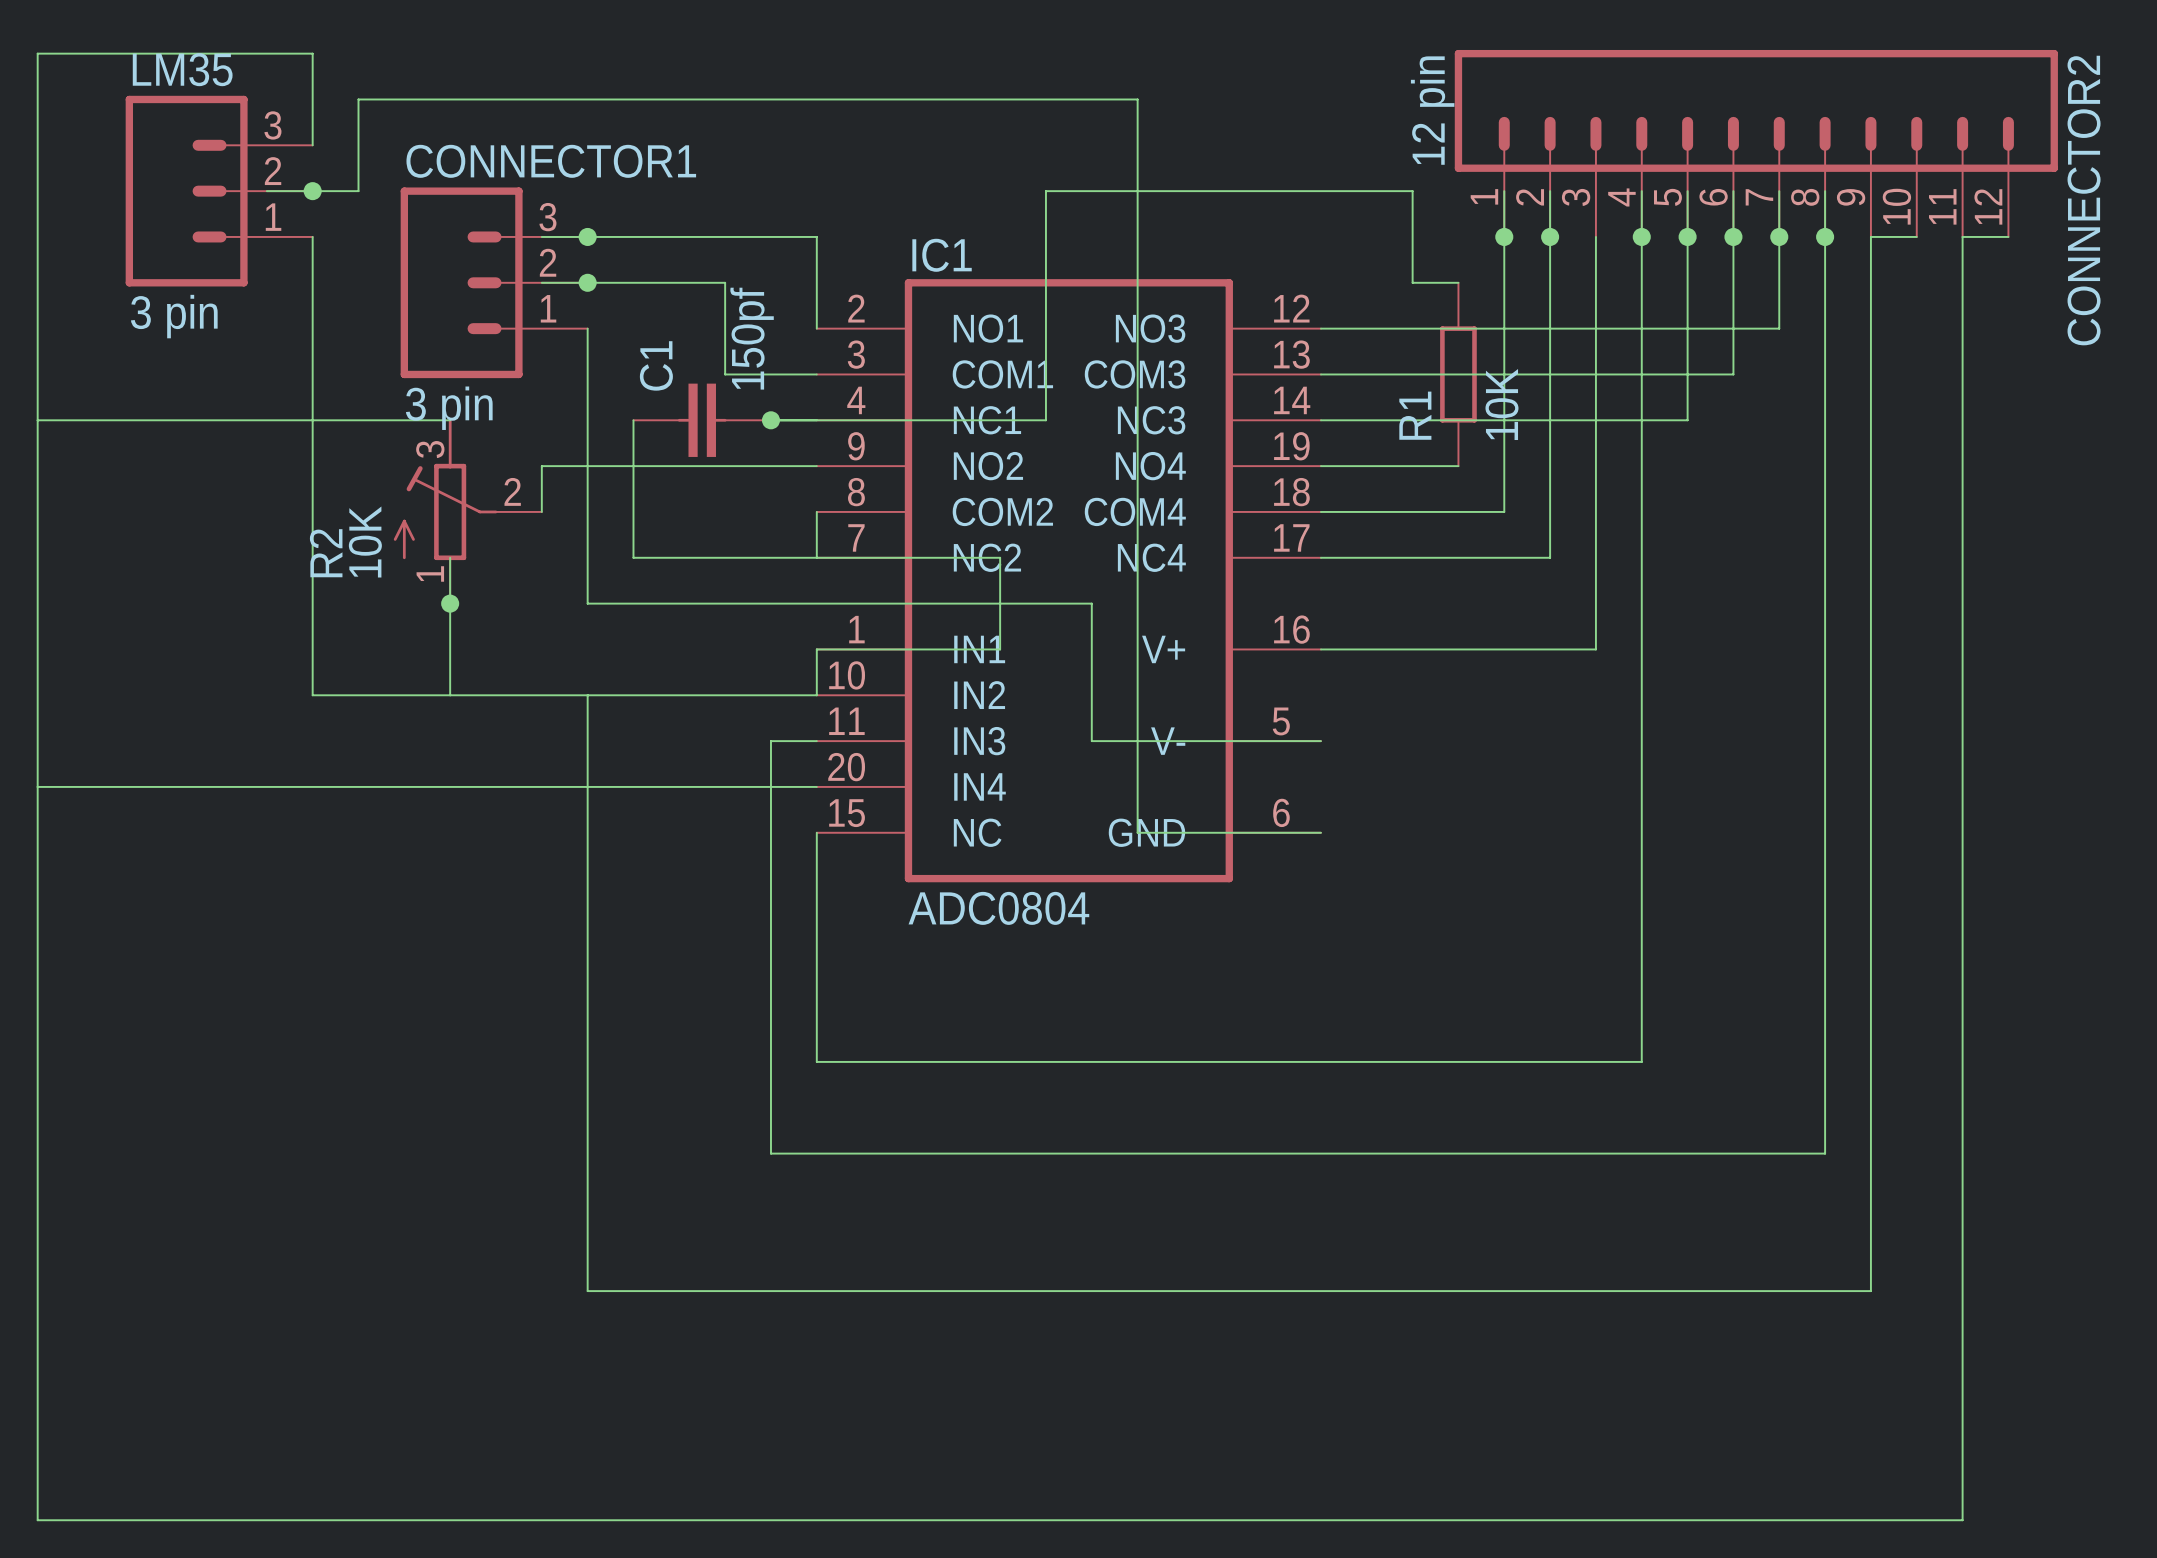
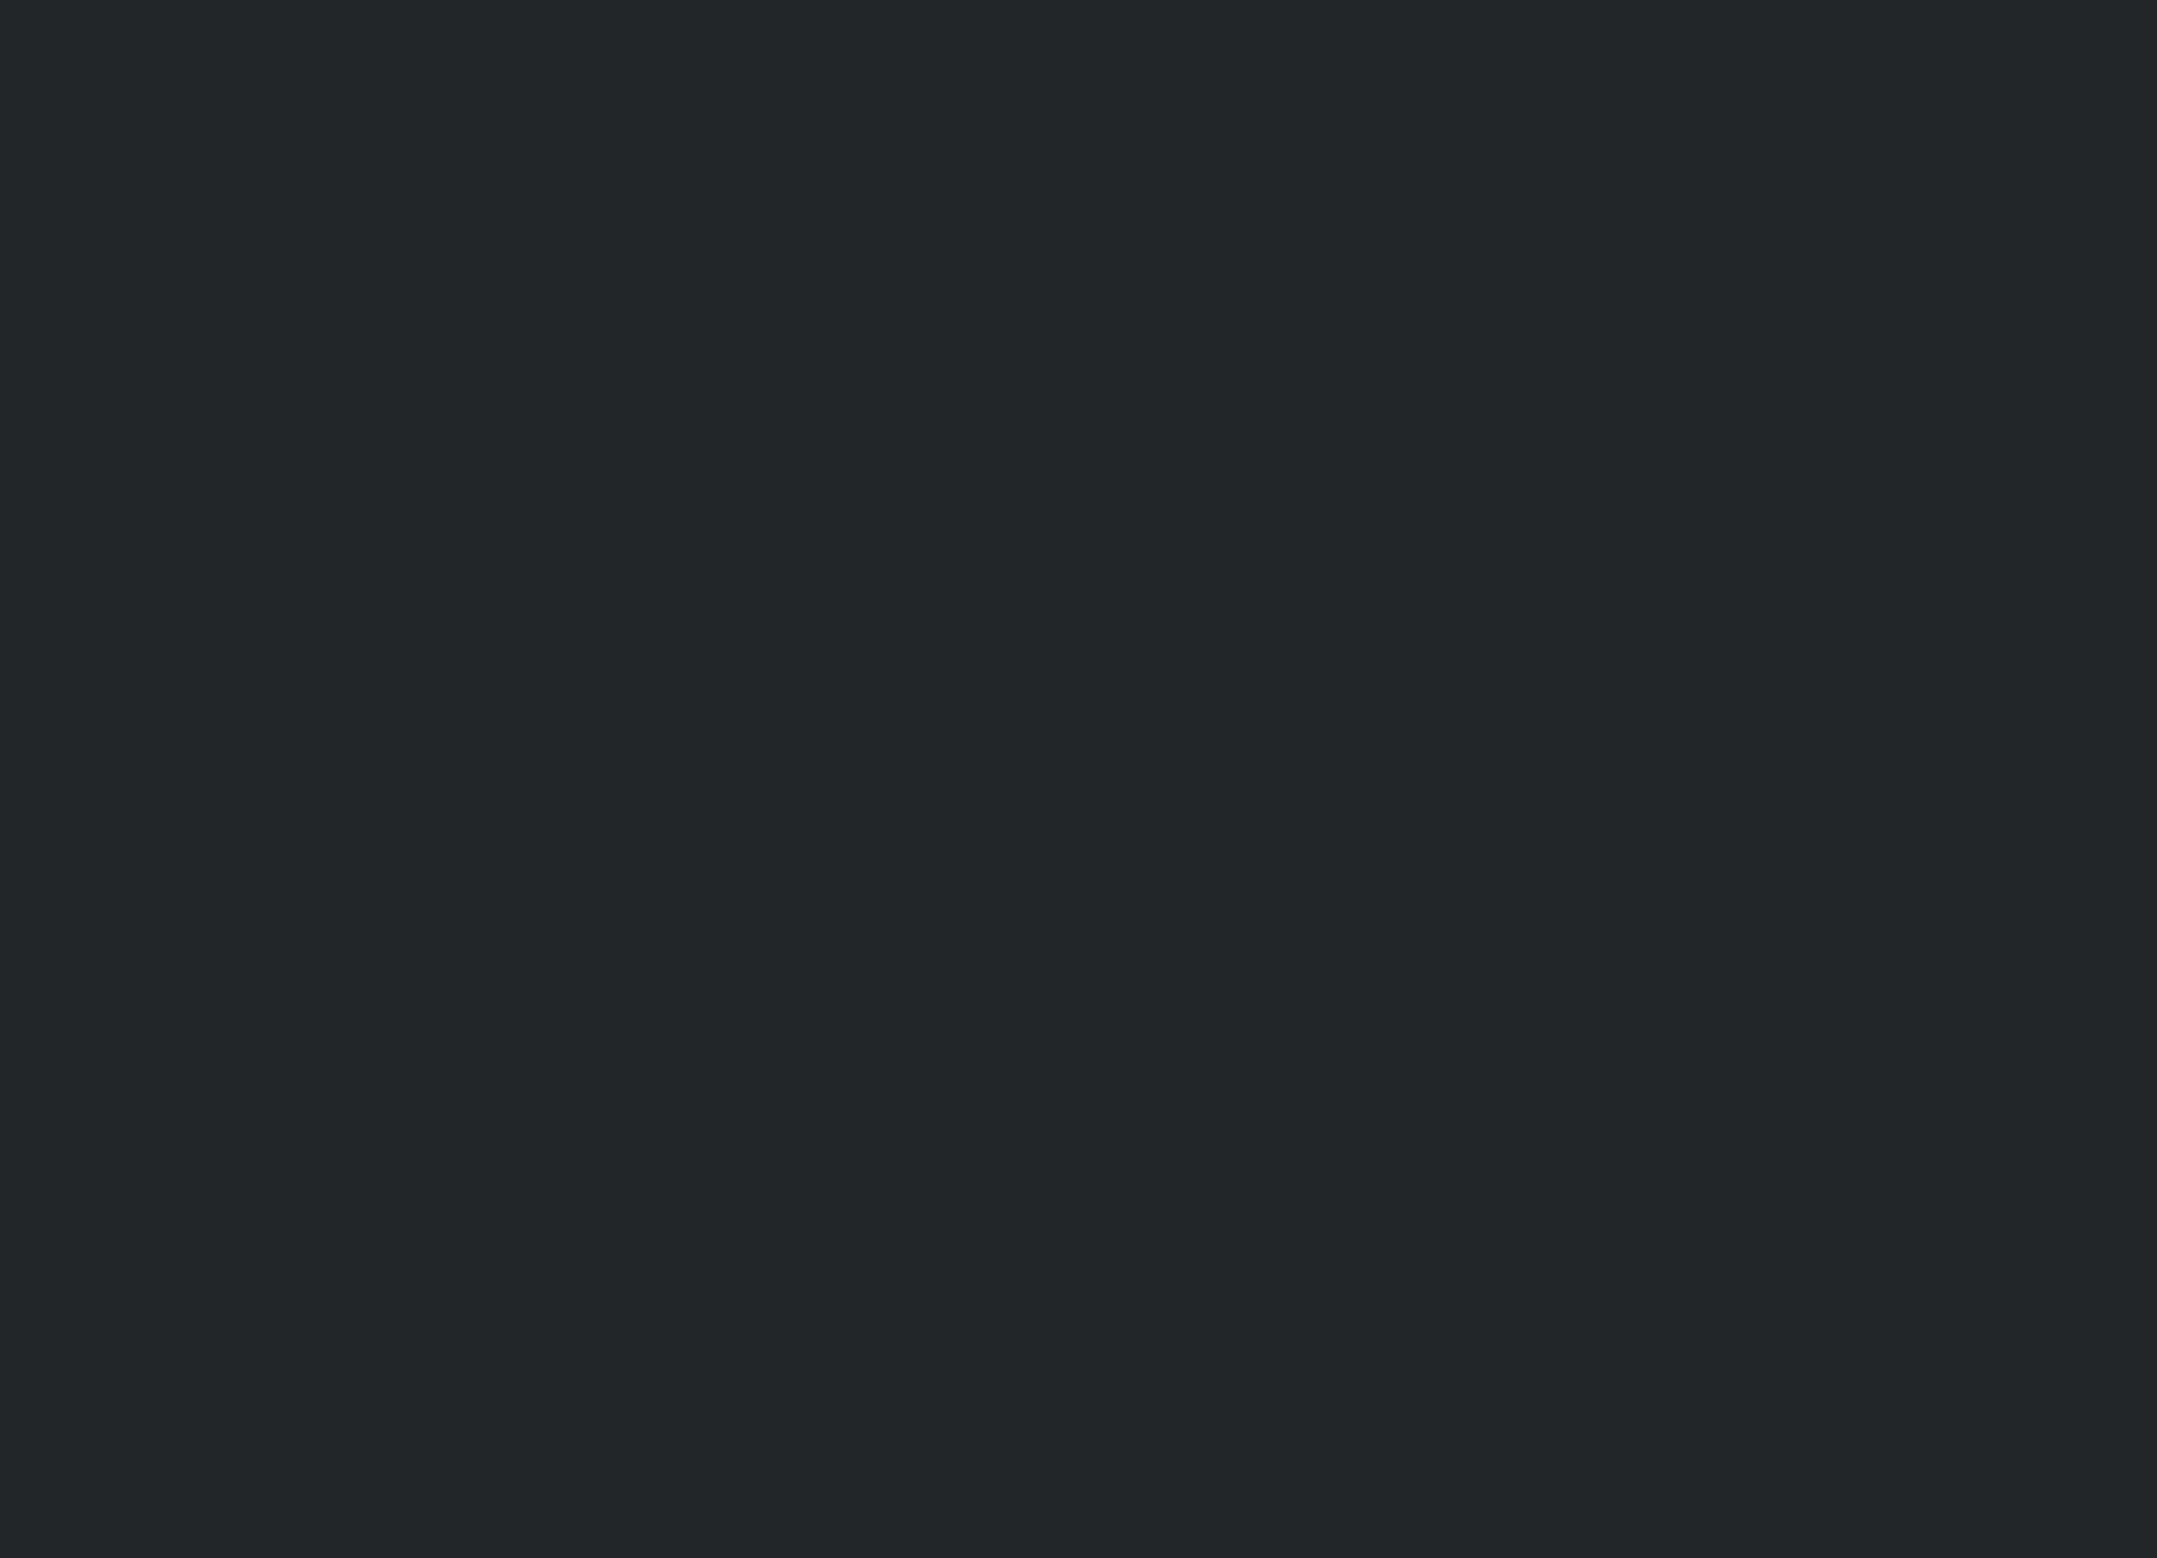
CONNECTOR2: 12 pin (1756, 143) -> none
wire: (312, 145) (312, 53) (37, 53) (37, 1520) (1962, 1520) (1962, 236) (2008, 236) -> none
LM35: 3 pin (219, 191) -> none
wire: (266, 191) (358, 191) (358, 99) (1137, 99) (1137, 832) (1320, 832) -> none
junction: (312, 191) -> none
wire: (1504, 191) (1504, 511) (1320, 511) -> none
wire: (1550, 191) (1550, 557) (1320, 557) -> none
wire: (1641, 191) (1641, 1061) (816, 1061) (816, 832) -> none
wire: (1687, 191) (1687, 420) (1320, 420) -> none
wire: (1733, 191) (1733, 374) (1320, 374) -> none
wire: (1779, 191) (1779, 328) (1320, 328) -> none
wire: (1825, 191) (1825, 1153) (770, 1153) (770, 741) (816, 741) -> none
wire: (312, 236) (312, 695) (816, 695) (816, 649) (1000, 649) (1000, 557) (633, 557) (633, 420) -> none
wire: (541, 236) (816, 236) (816, 328) -> none
junction: (587, 236) -> none
junction: (1504, 236) -> none
junction: (1550, 236) -> none
wire: (1595, 236) (1595, 649) (1320, 649) -> none
junction: (1641, 236) -> none
junction: (1687, 236) -> none
junction: (1733, 236) -> none
junction: (1779, 236) -> none
junction: (1825, 236) -> none
wire: (1916, 236) (1870, 236) (1870, 1291) (587, 1291) (587, 695) -> none
CONNECTOR1: 3 pin (494, 282) -> none
wire: (541, 282) (725, 282) (725, 374) (816, 374) -> none
junction: (587, 282) -> none
wire: (1458, 282) (1412, 282) (1412, 191) (1045, 191) (1045, 420) (770, 420) -> none
wire: (587, 328) (587, 603) (1091, 603) (1091, 741) (1320, 741) -> none
R1: 10K (1458, 374) -> none
wire: (37, 420) (450, 420) -> none
C1: 150pf (702, 420) -> none
junction: (770, 420) -> none
wire: (816, 466) (541, 466) (541, 511) -> none
wire: (1320, 466) (1458, 466) -> none
R2: 10K (467, 511) -> none
wire: (816, 511) (816, 557) -> none
wire: (450, 557) (450, 695) -> none
IC1: ADC0804 (1068, 580) -> none
junction: (450, 603) -> none
wire: (37, 786) (816, 786) -> none

